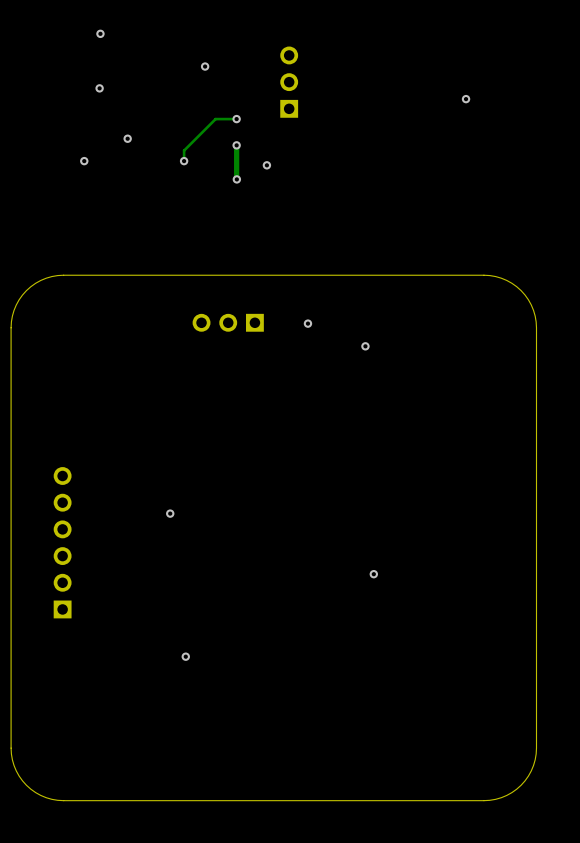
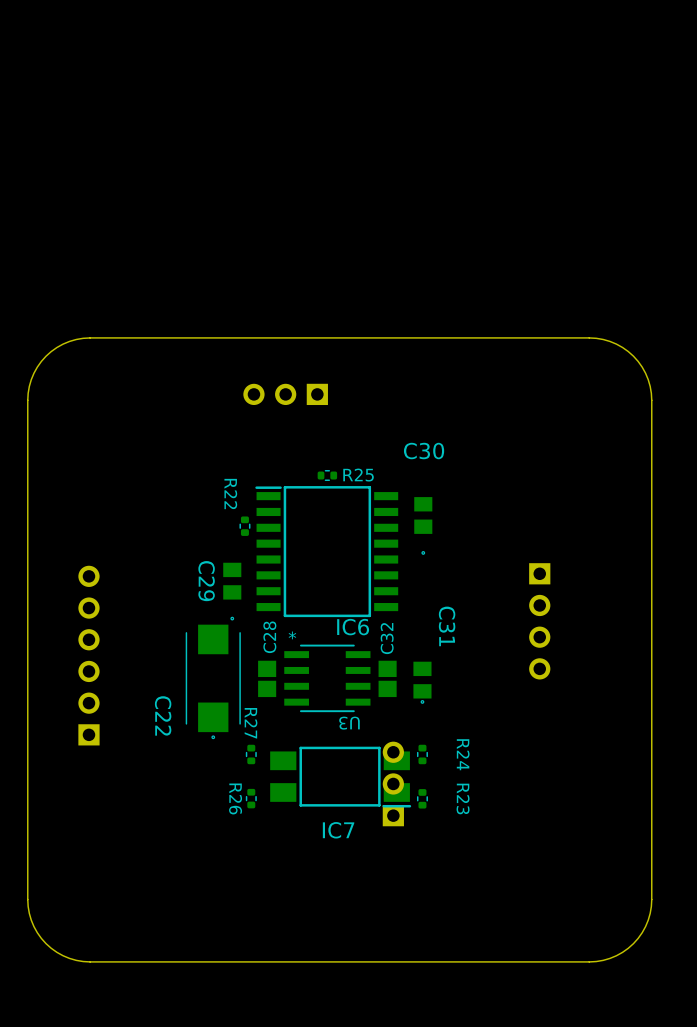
via: (100, 33) -> none
via: (205, 66) -> none
part: (289, 82) -> none
via: (99, 88) -> none
via: (466, 99) -> none
track: (236, 119) (215, 119) (184, 150) (184, 161) -> none
via: (236, 119) -> none
via: (127, 138) -> none
track: (236, 145) (236, 179) -> none
via: (236, 145) -> none
via: (84, 161) -> none
via: (184, 161) -> none
via: (266, 165) -> none
via: (236, 179) -> none
via: (307, 323) -> none
via: (365, 346) -> none
R25: none -> (327, 475)
R22: none -> (244, 526)
C30: none -> (423, 525)
IC6: none -> (326, 551)
C29: none -> (232, 591)
via: (170, 513) -> none
part: none -> (539, 621)
U3: none -> (327, 678)
C28: none -> (267, 678)
C32: none -> (387, 678)
C22: none -> (213, 681)
C31: none -> (422, 682)
via: (373, 574) -> none
R27: none -> (251, 754)
R24: none -> (422, 754)
IC7: none -> (340, 777)
part: none -> (393, 783)
via: (185, 656) -> none
R26: none -> (251, 798)
R23: none -> (422, 798)

